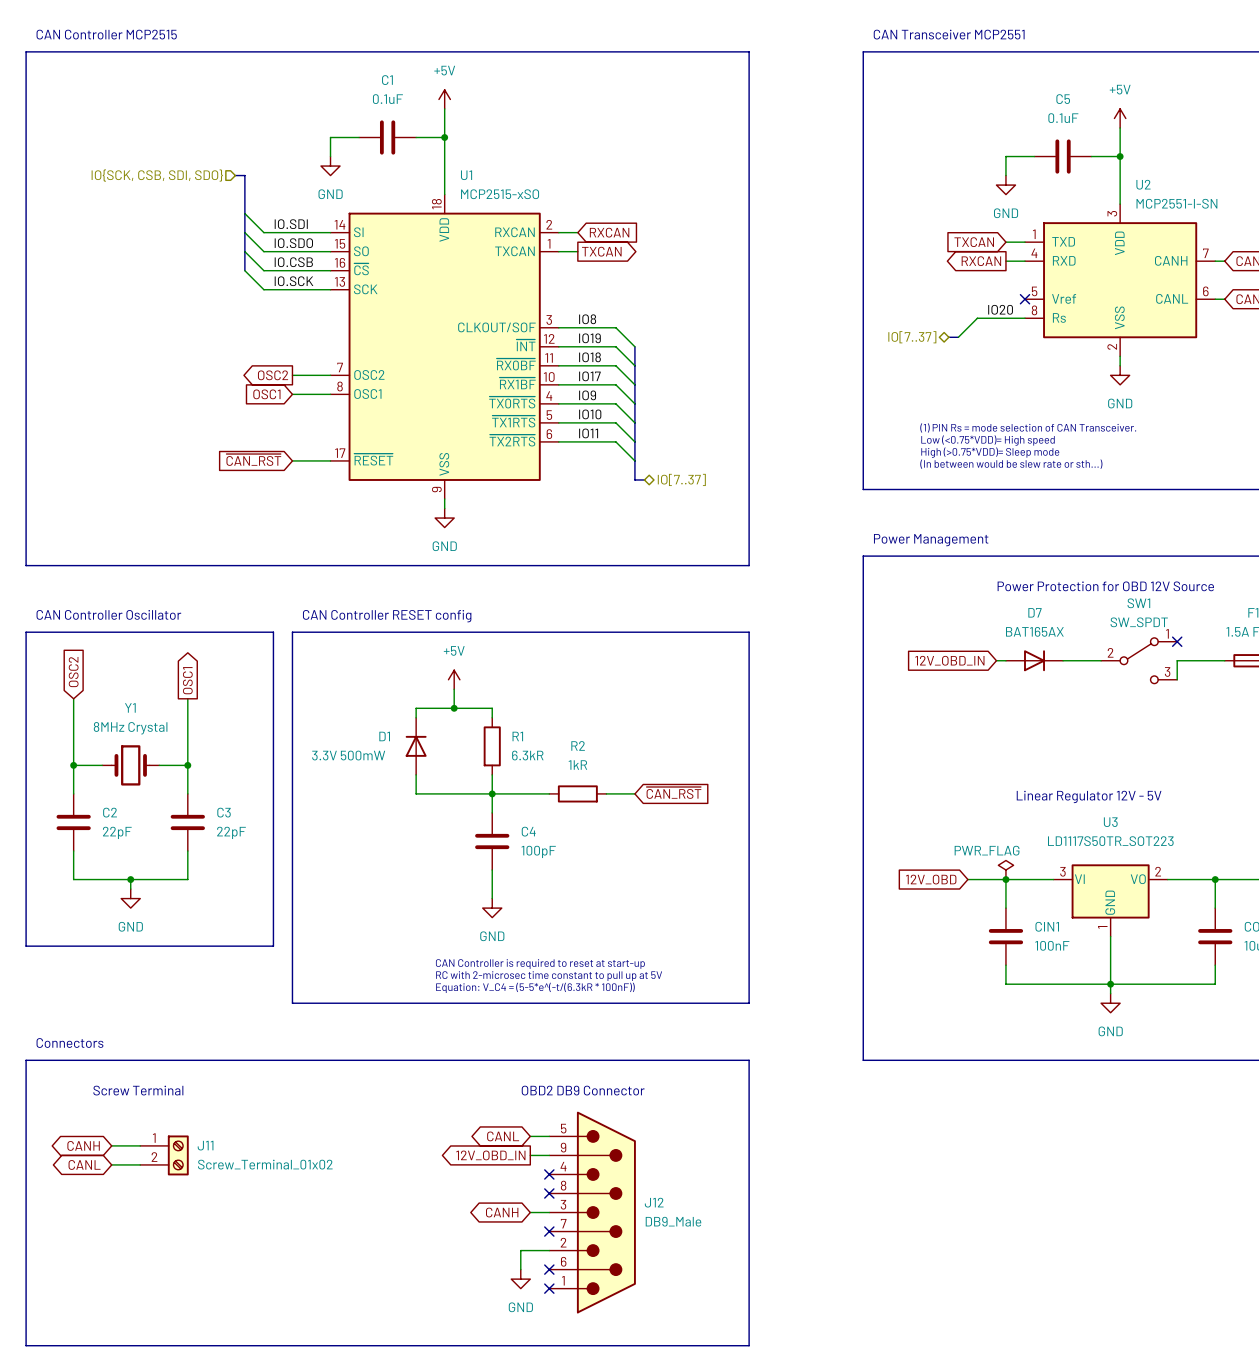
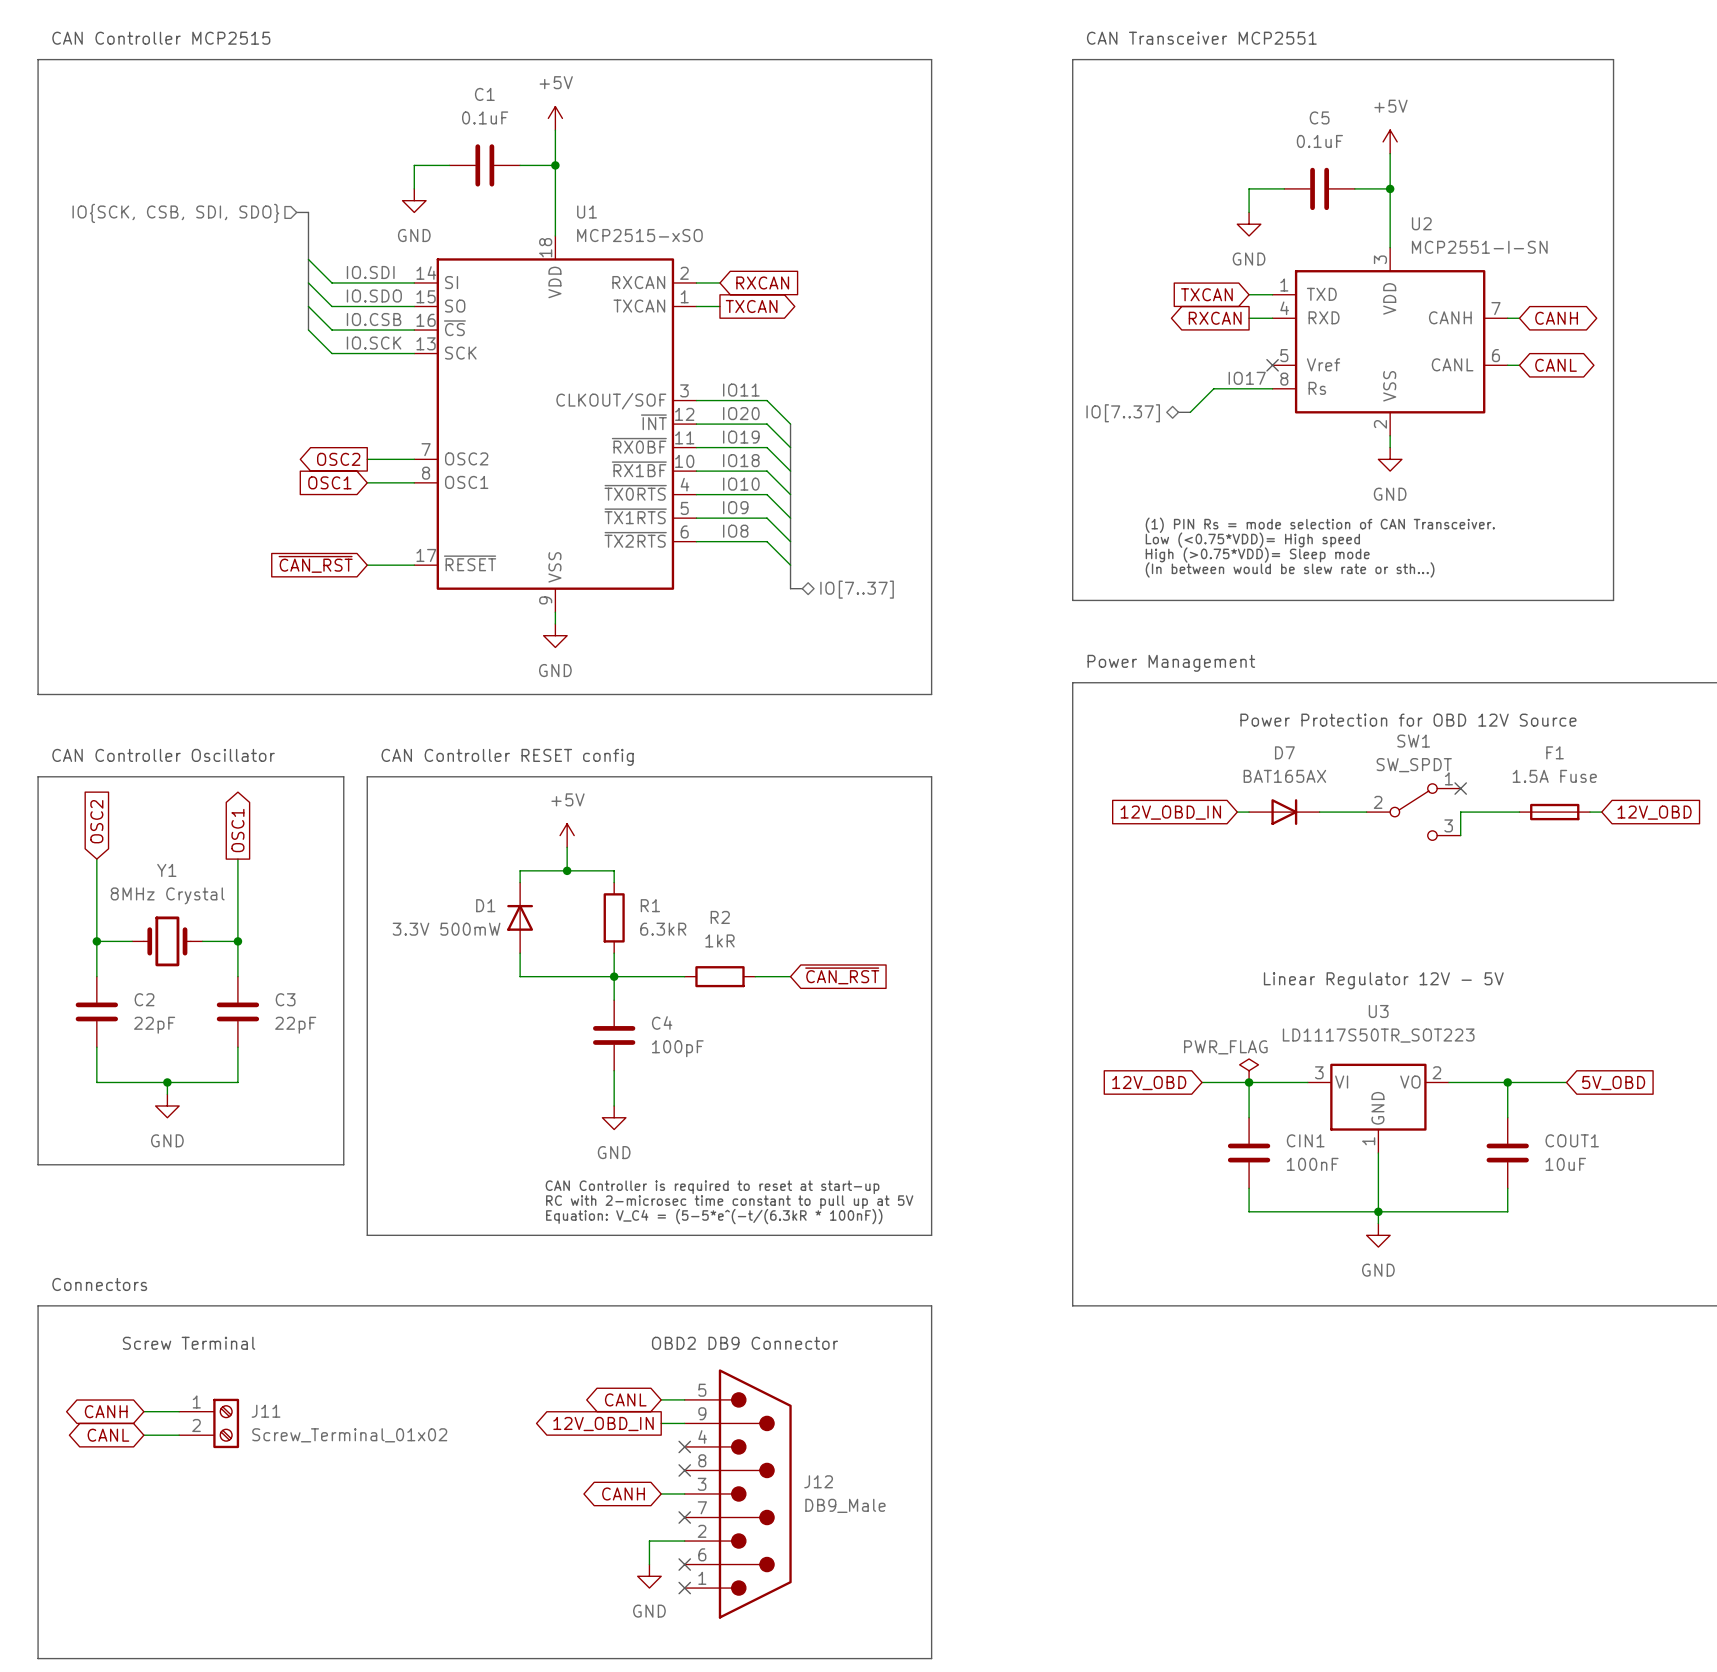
label: IO20 (1000, 309) -> IO17 (1247, 378)
label: IO8 (587, 319) -> IO11 (741, 390)
label: IO19 (589, 338) -> IO20 (741, 413)
label: IO18 (589, 357) -> IO19 (741, 437)
label: IO17 (589, 376) -> IO18 (741, 460)
label: IO9 (587, 395) -> IO10 (741, 484)
label: IO10 (590, 414) -> IO9 (735, 507)
label: IO11 (588, 433) -> IO8 (735, 531)

